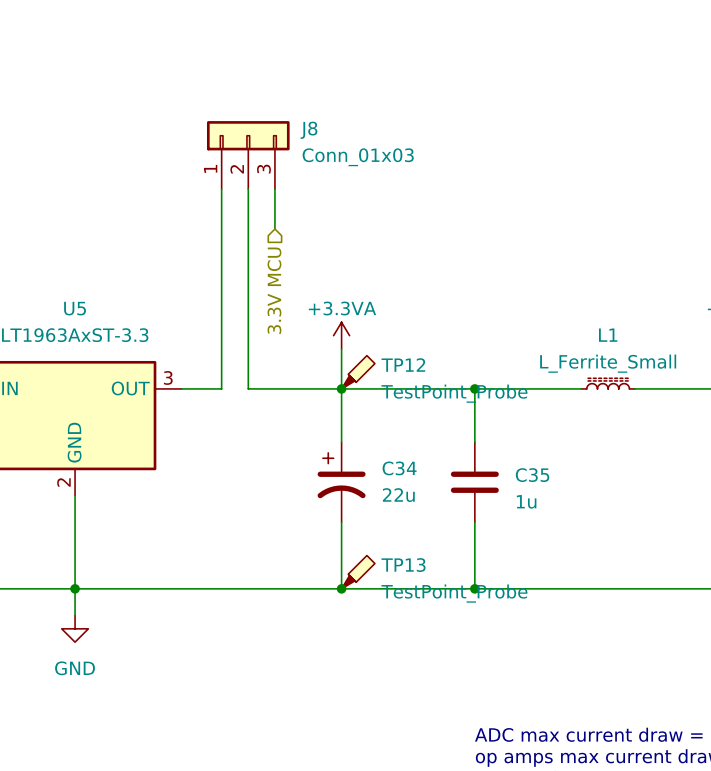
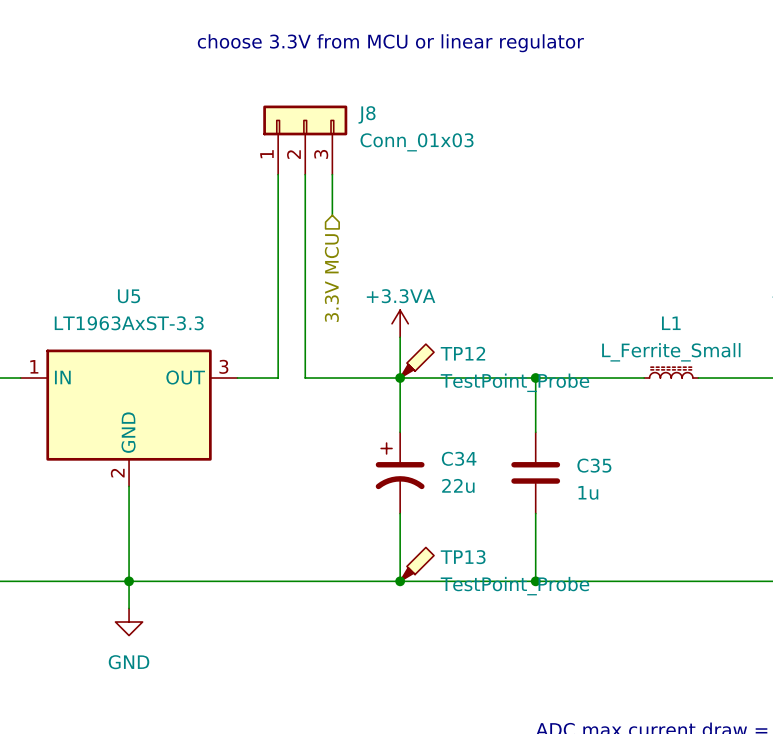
text: none -> choose 3.3V from MCU or linear regulator (390, 43)

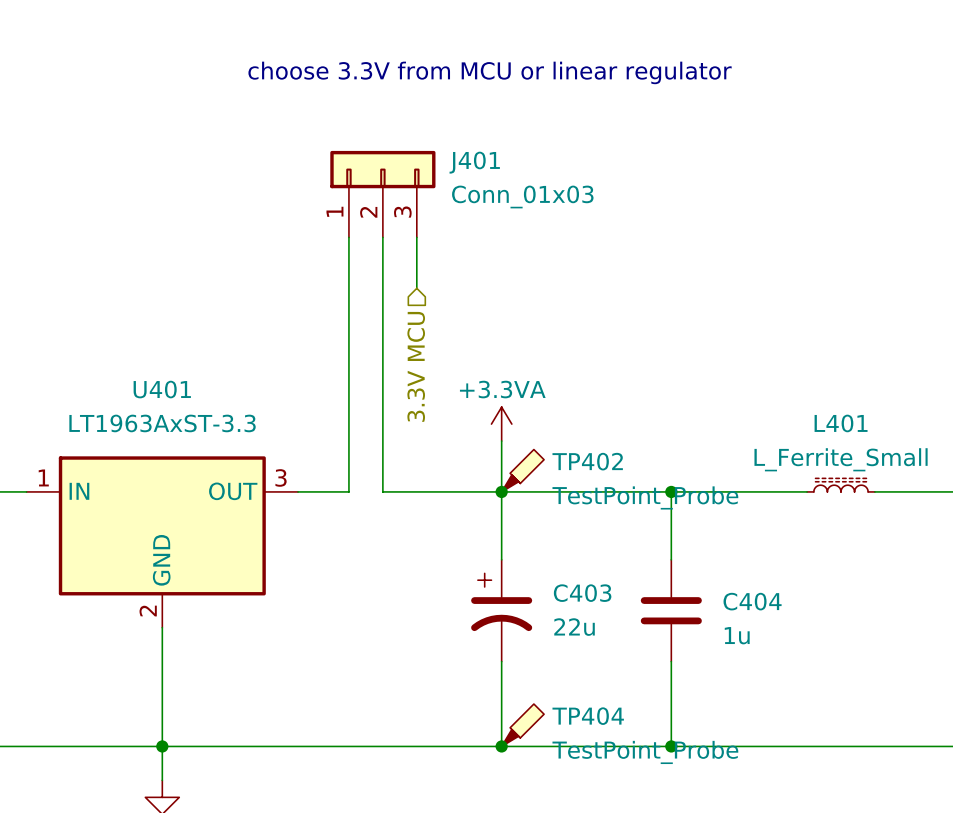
J8 name: J8 (367, 114) -> J401 (474, 162)
U5 name: U5 (129, 296) -> U401 (162, 389)
L1 name: L1 (671, 323) -> L401 (841, 423)
TP12 name: TP12 (462, 353) -> TP402 (587, 461)
C34 name: C34 (459, 458) -> C403 (582, 593)
C35 name: C35 (594, 465) -> C404 (752, 601)
TP13 name: TP13 (463, 557) -> TP404 (588, 716)

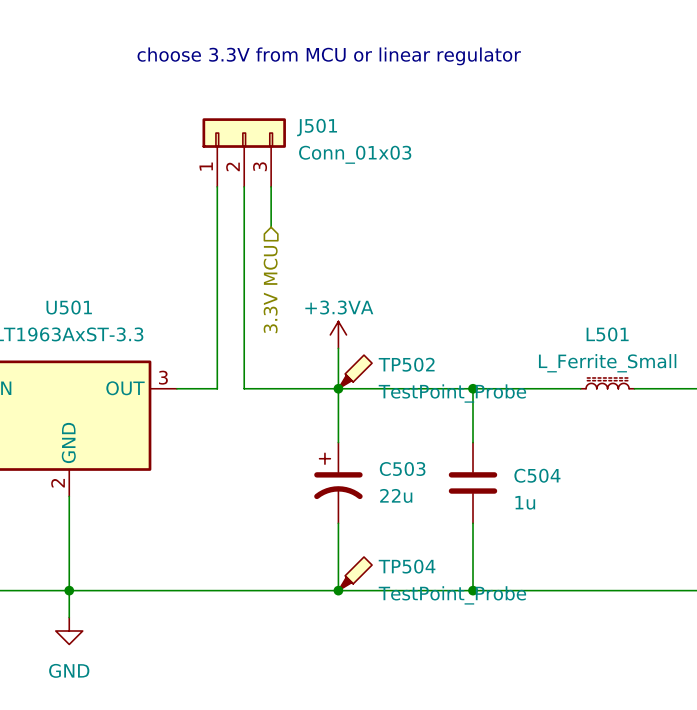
J401 name: J401 (474, 162) -> J501 (317, 127)
U401 name: U401 (162, 389) -> U501 (69, 307)
L401 name: L401 (841, 423) -> L501 (607, 334)
TP402 name: TP402 (587, 461) -> TP502 (406, 364)
C403 name: C403 (582, 593) -> C503 (402, 469)
C404 name: C404 (752, 601) -> C504 (537, 475)
TP404 name: TP404 (588, 716) -> TP504 (407, 566)

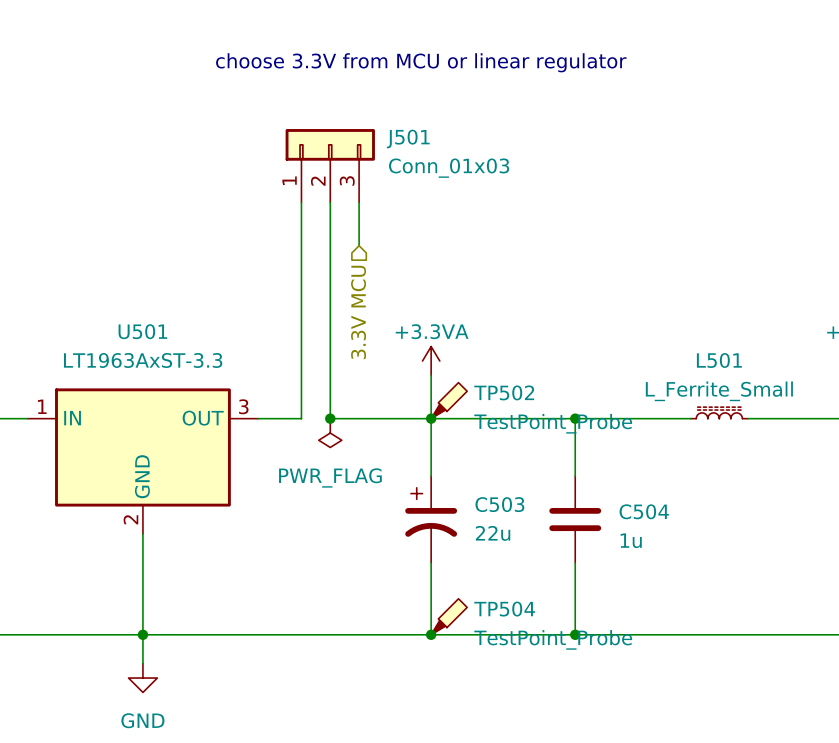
junction: none -> (330, 418)
power symbol: none -> PWR_FLAG (330, 433)

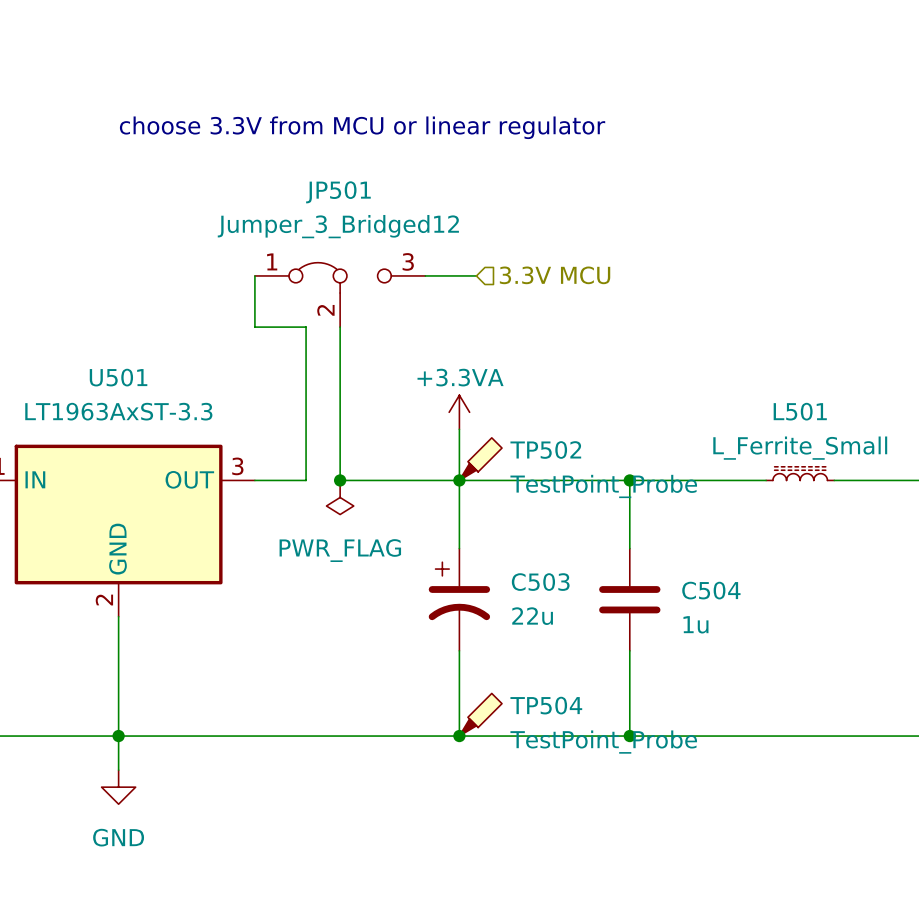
text position: choose 3.3V from MCU or linear regulator (421, 62) -> choose 3.3V from MCU or linear regulator (362, 127)
J501: Conn_01x03 (330, 165) -> none
wire: (301, 202) (301, 288) -> (254, 275) (254, 327) (306, 327)
wire: (330, 202) (330, 288) -> none
wire: (359, 202) (359, 245) -> none
wire: none -> (425, 275) (476, 275)
JP501: none -> Jumper_3_Bridged12 (340, 294)
hierarchical label rotation: 0° (358, 312) -> 90° counterclockwise (555, 275)
hierarchical label position: 3.3V MCU (358, 312) -> 3.3V MCU (555, 275)

